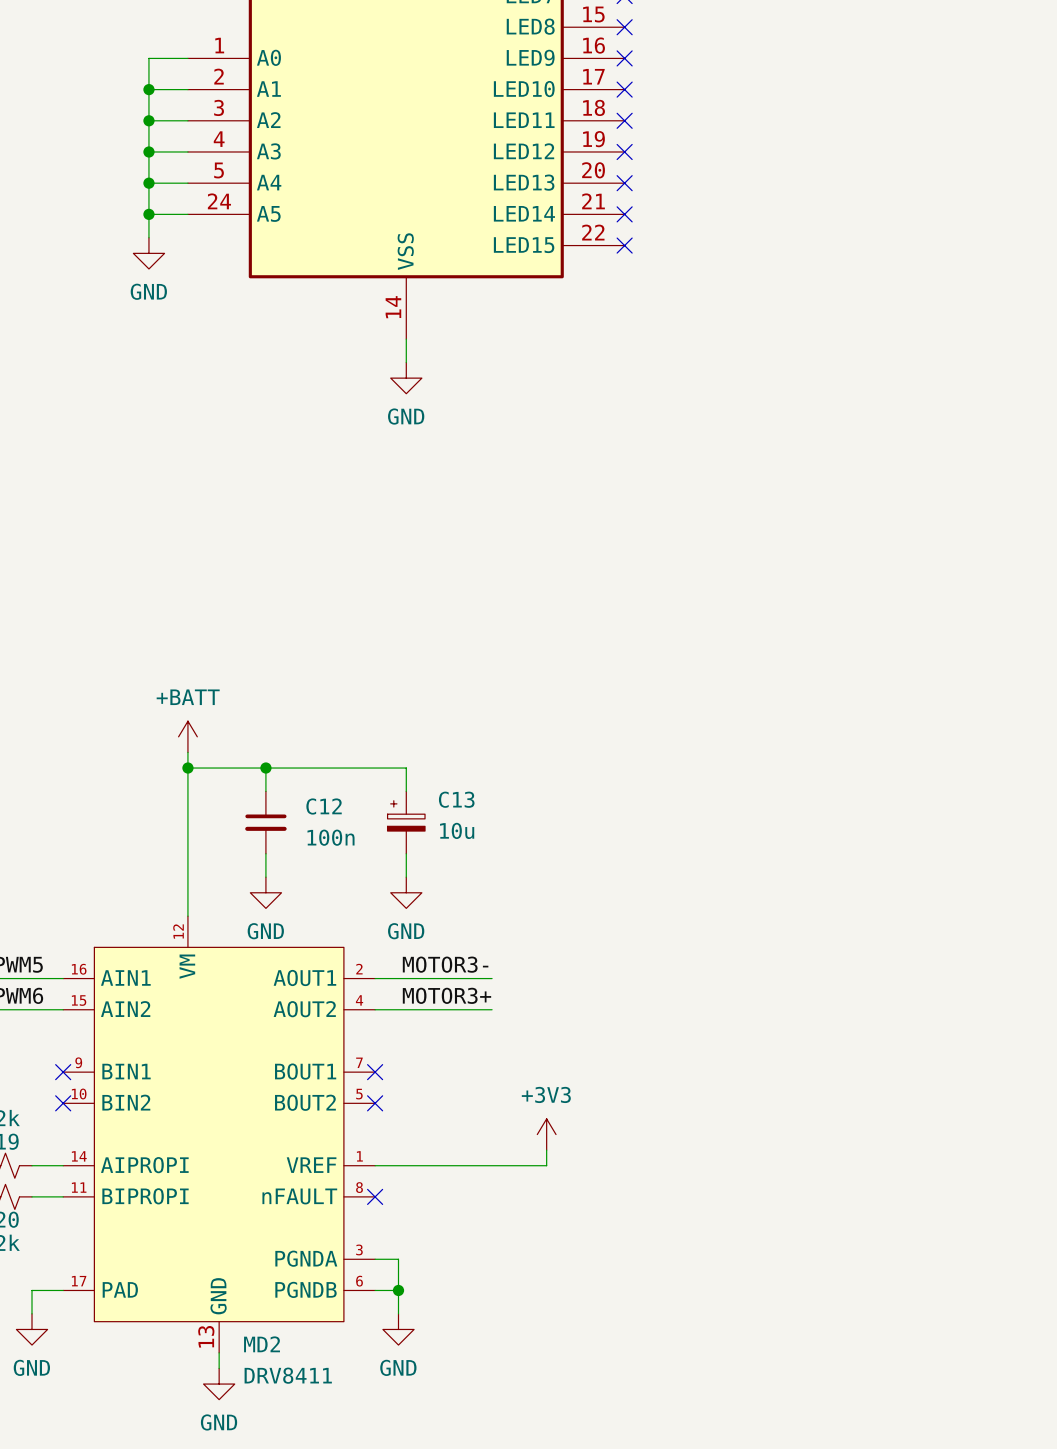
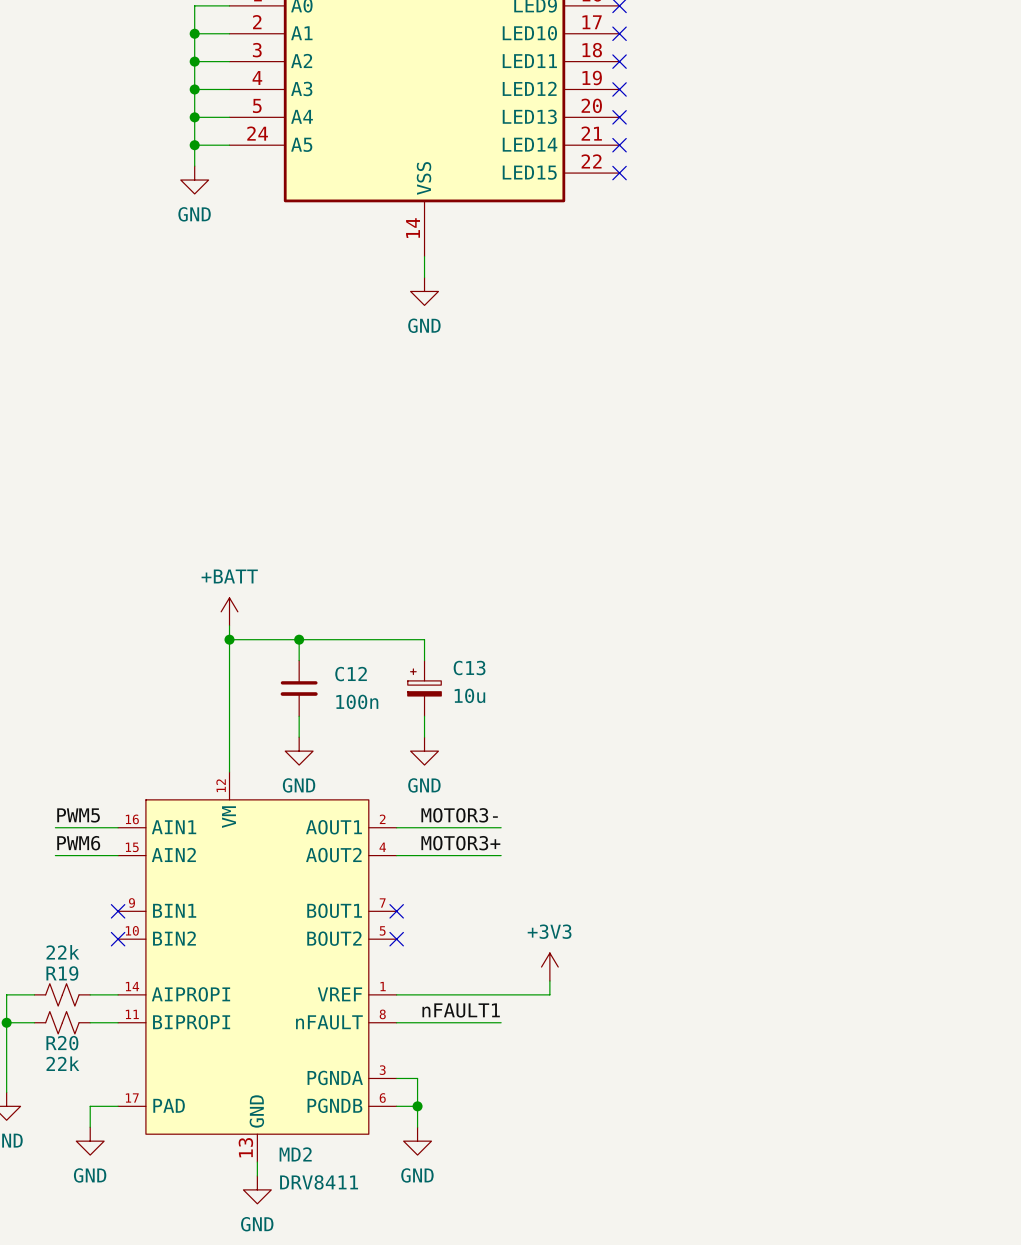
label: none -> nFAULT1 (461, 1010)
wire: none -> (396, 1022) (501, 1022)
no-connect mark: (375, 1196) -> none

